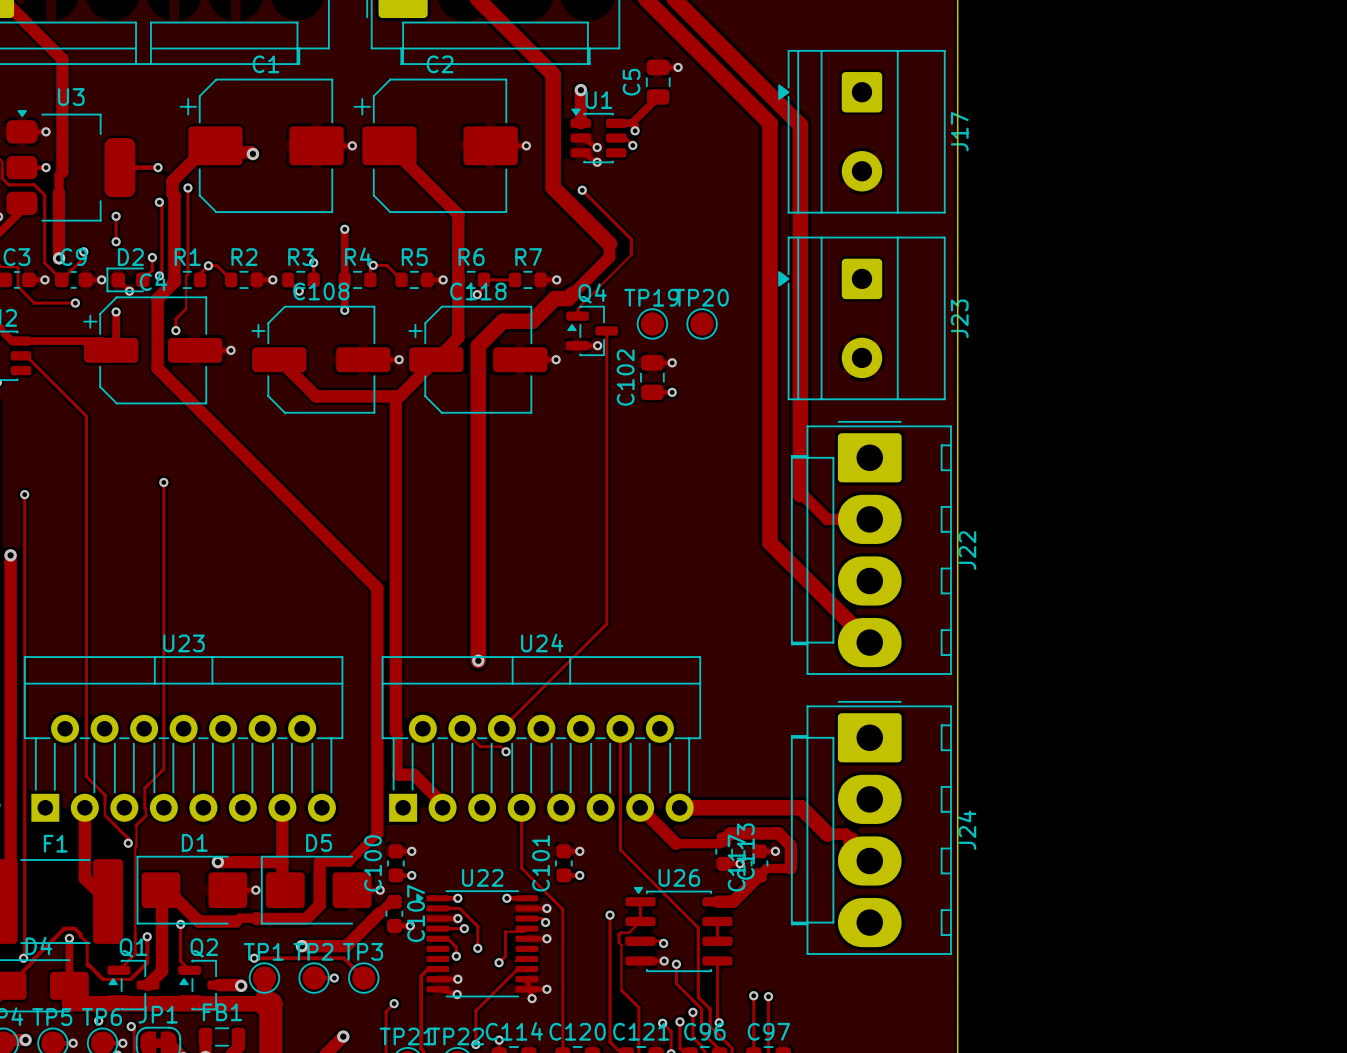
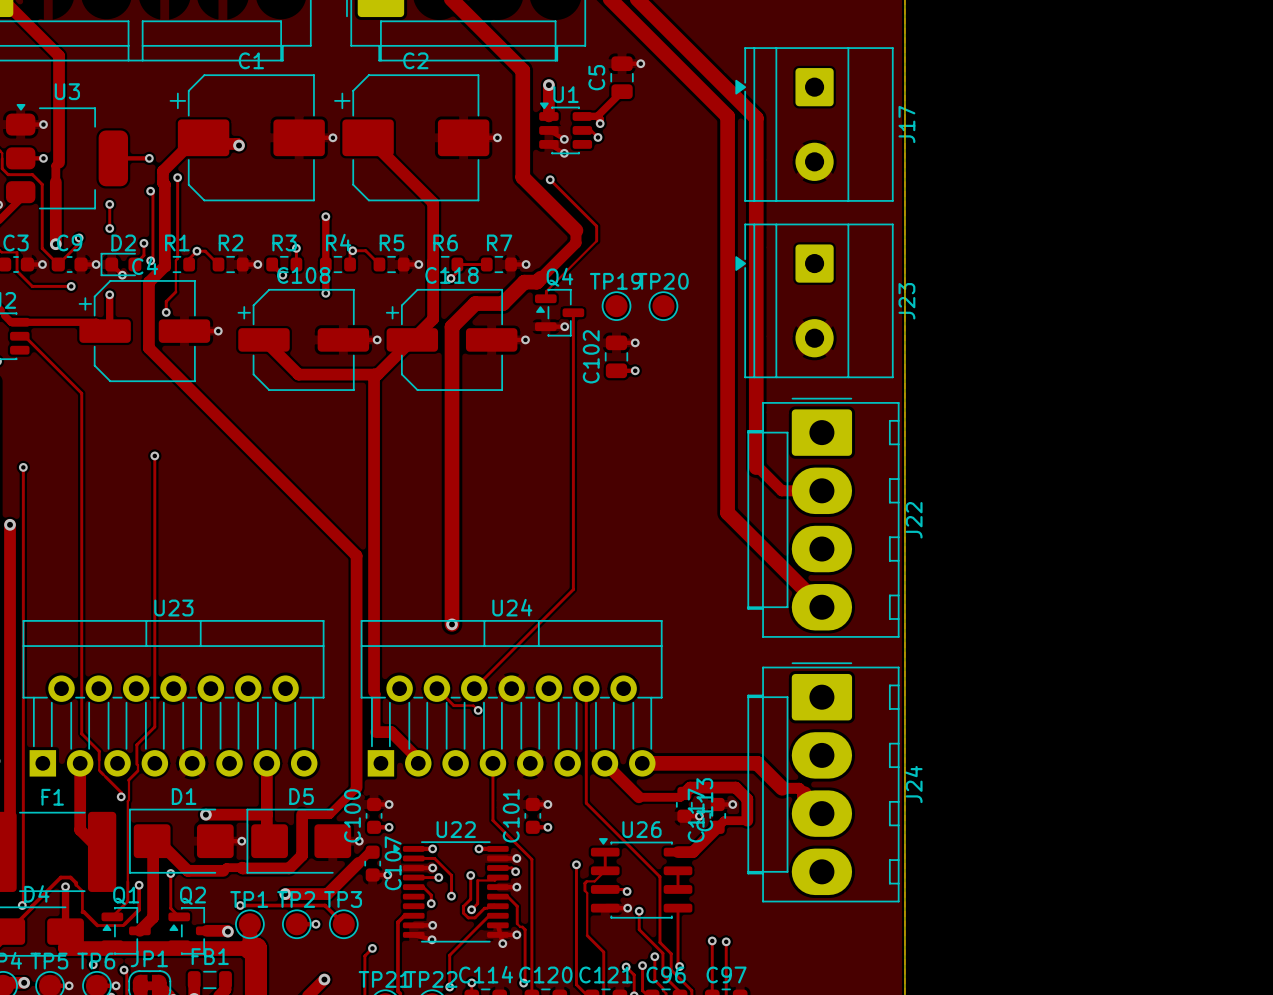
track: none -> (470, 875) (470, 899) (463, 906) (463, 913) (468, 917) (474, 917) (484, 908) (487, 908)
via: none -> (470, 875)
track: none -> (507, 896) (517, 906) (517, 923) (525, 929) (523, 983)
via: none -> (523, 983)

